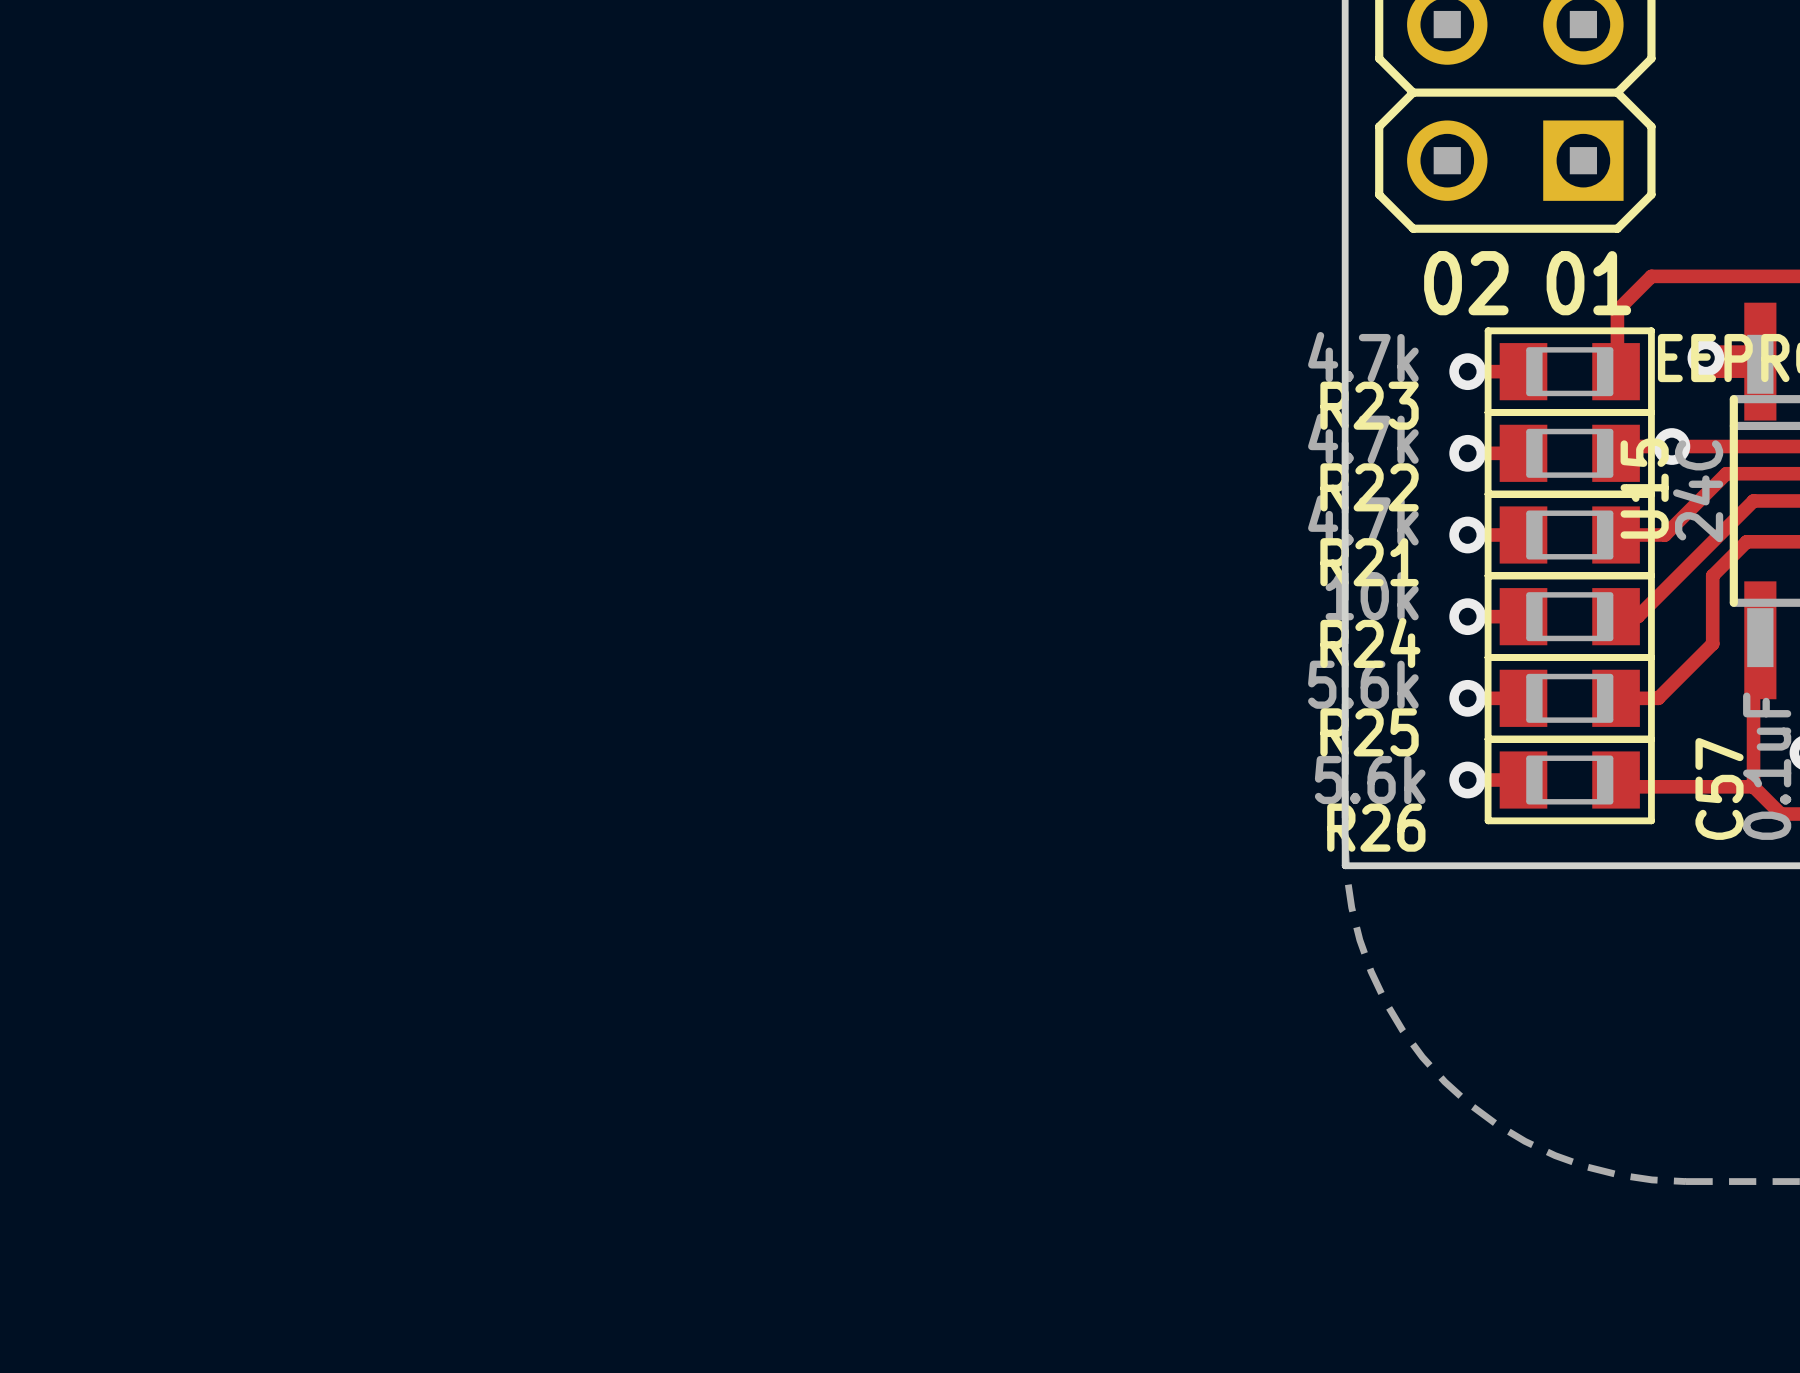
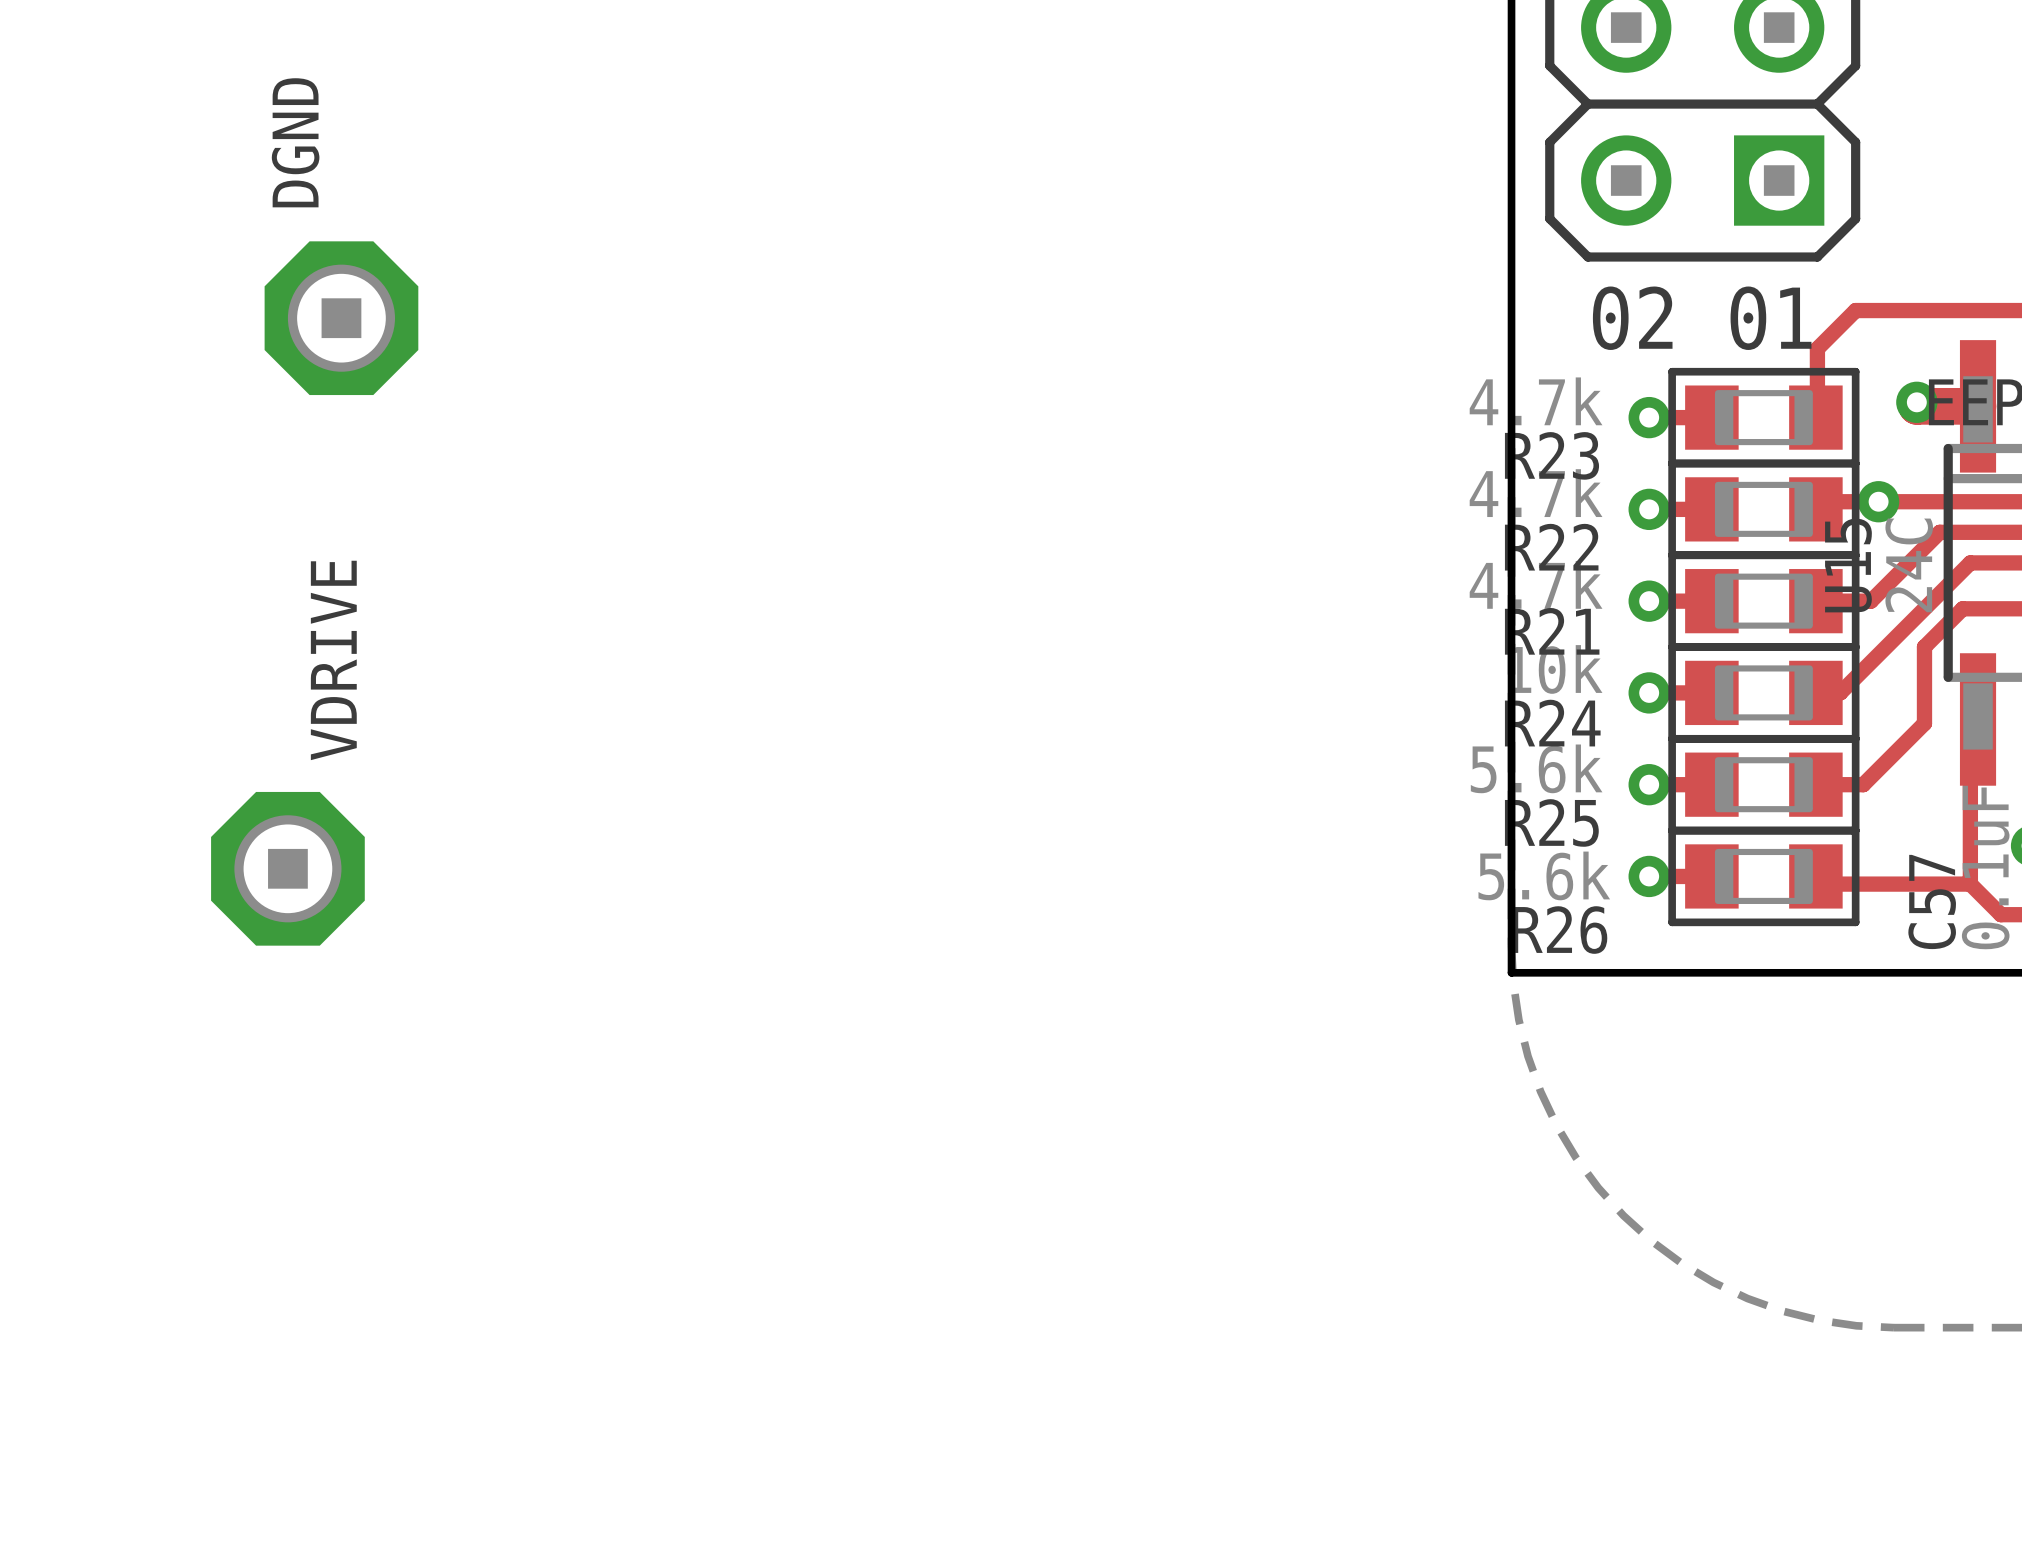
DGND: none -> (341, 318)
VDRIVE: none -> (287, 868)

